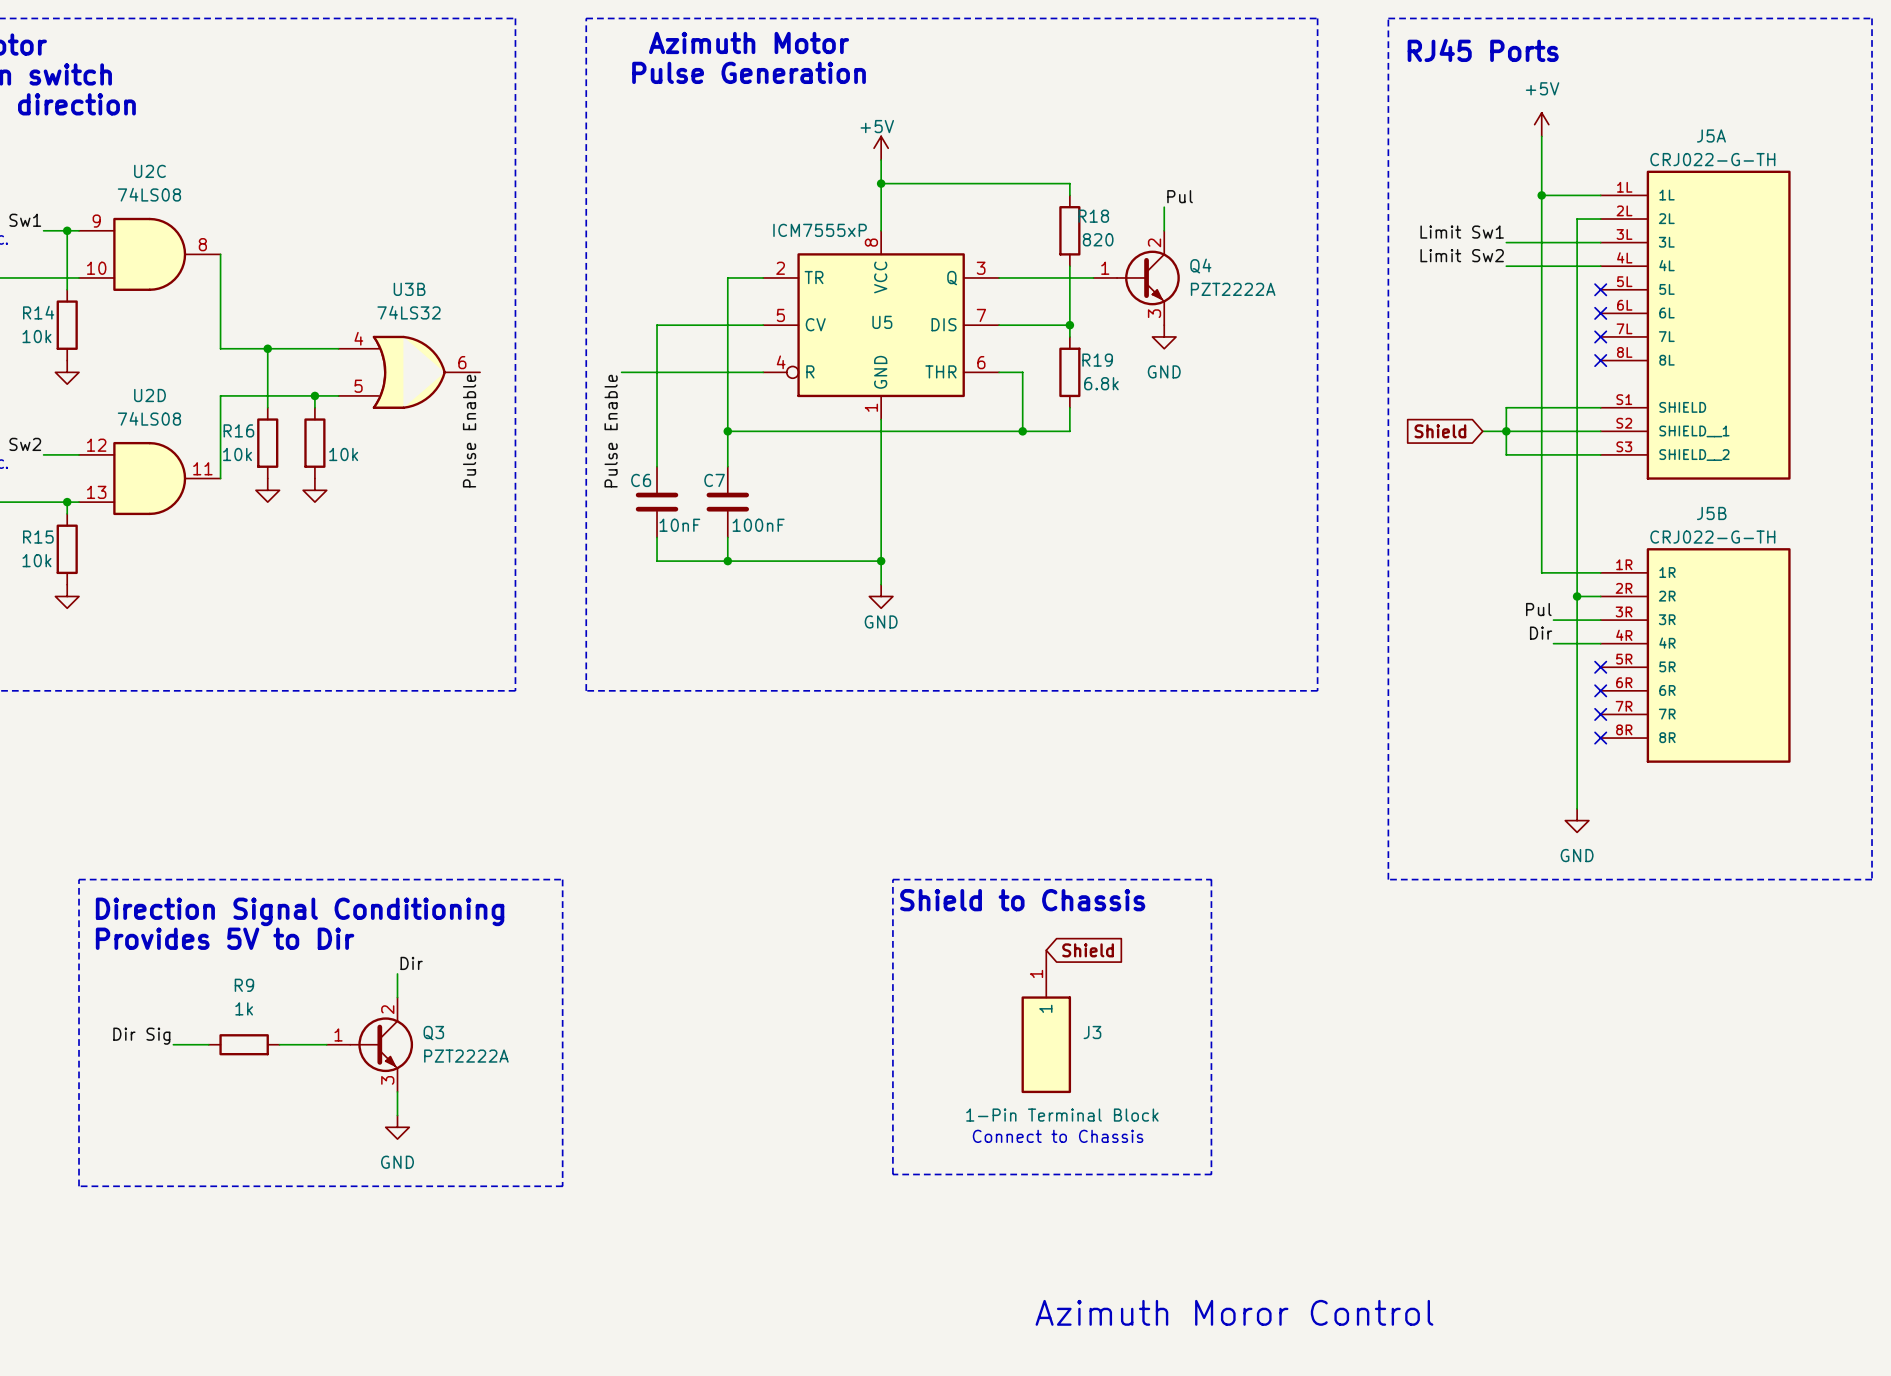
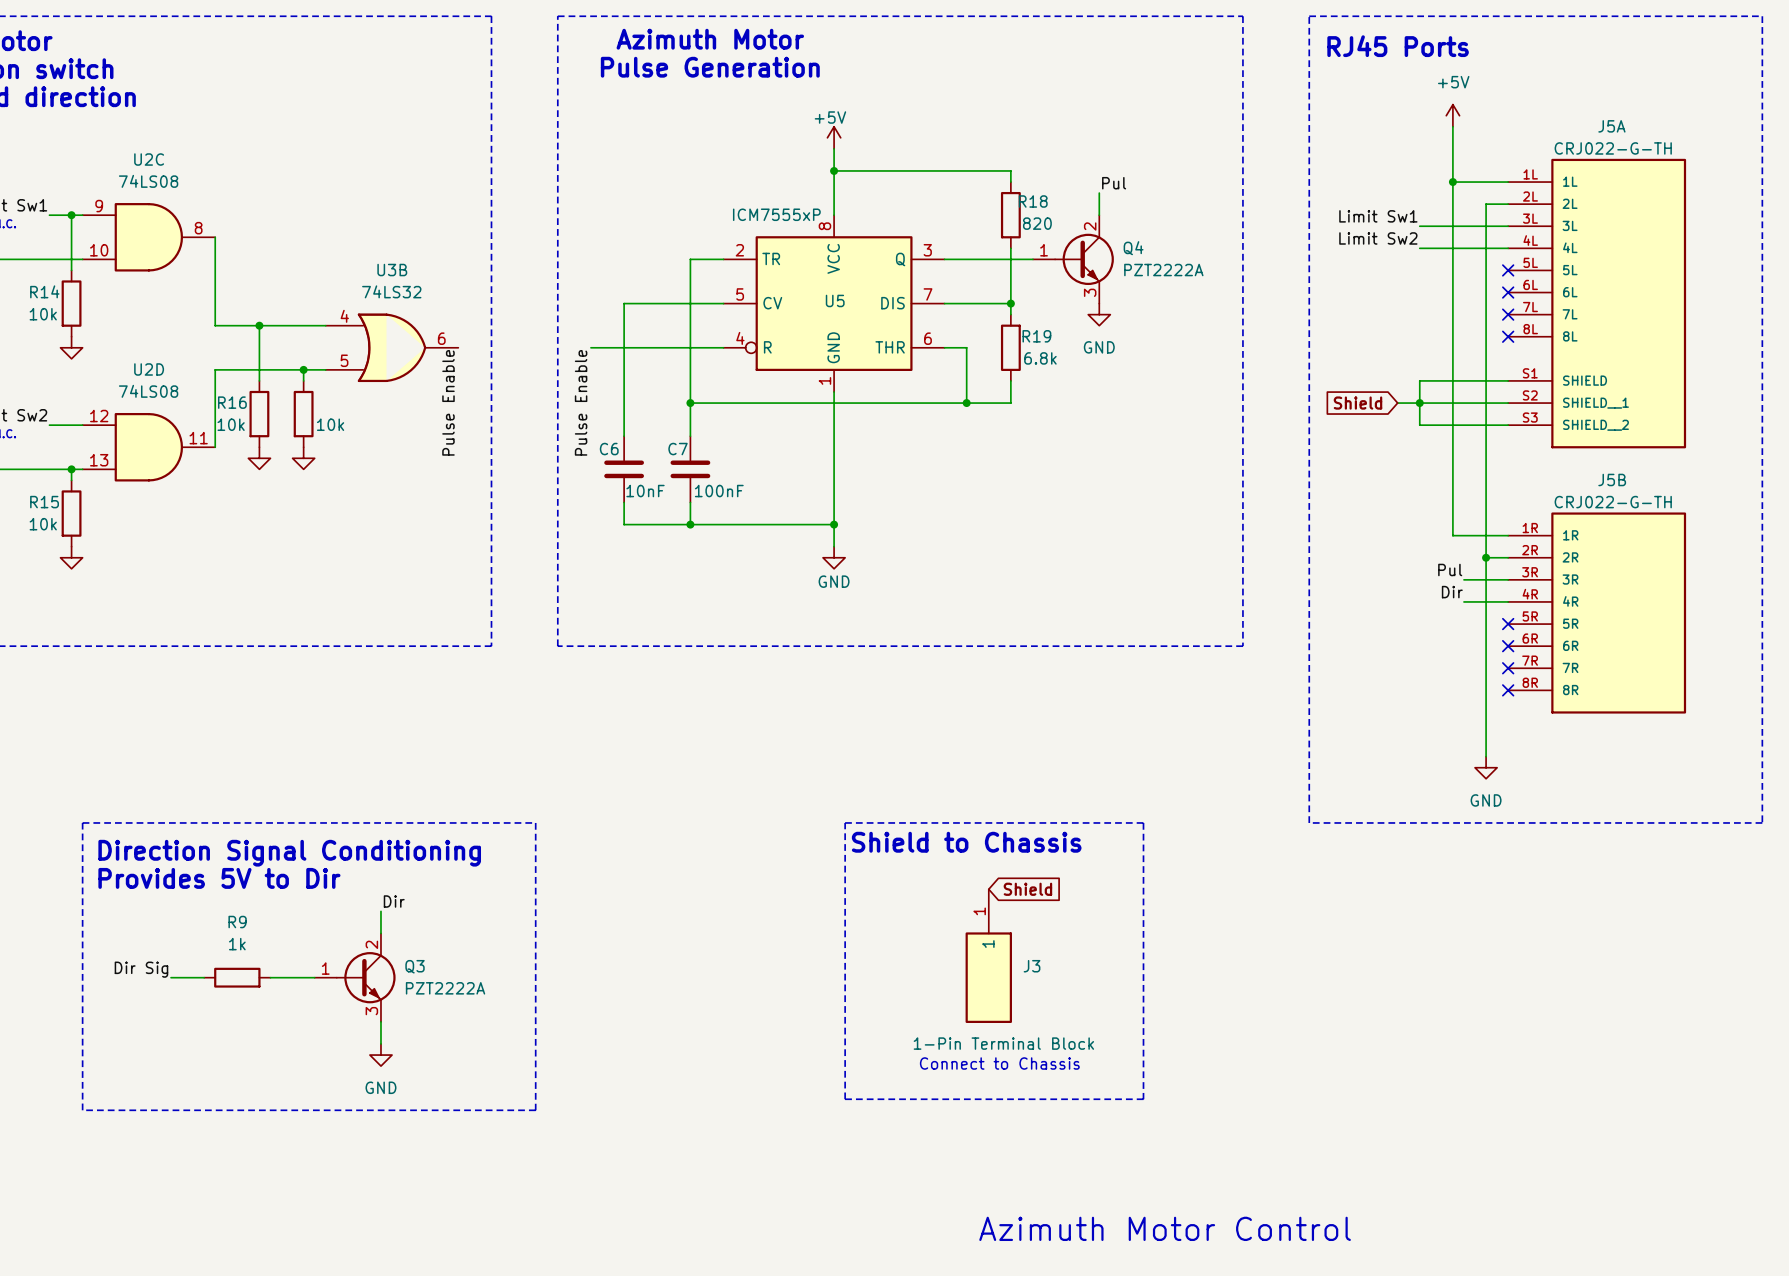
text: Azimuth Moror Control (1234, 1312) -> Azimuth Motor Control (1165, 1228)

